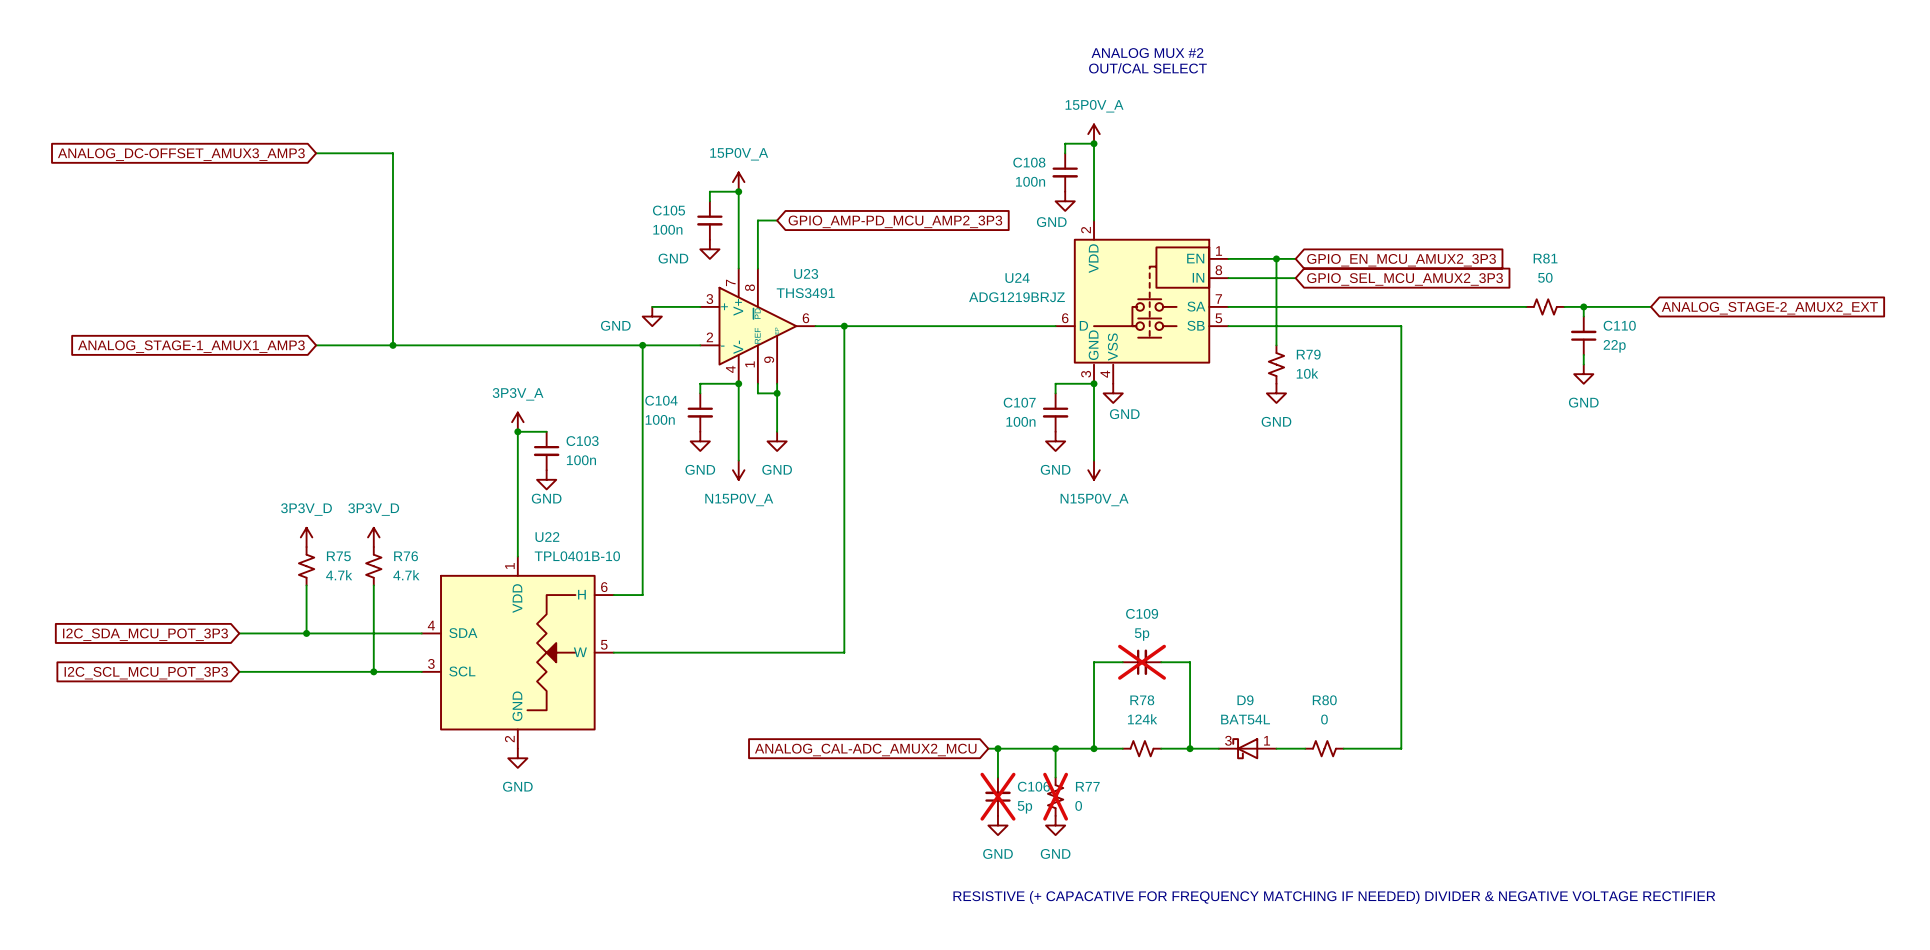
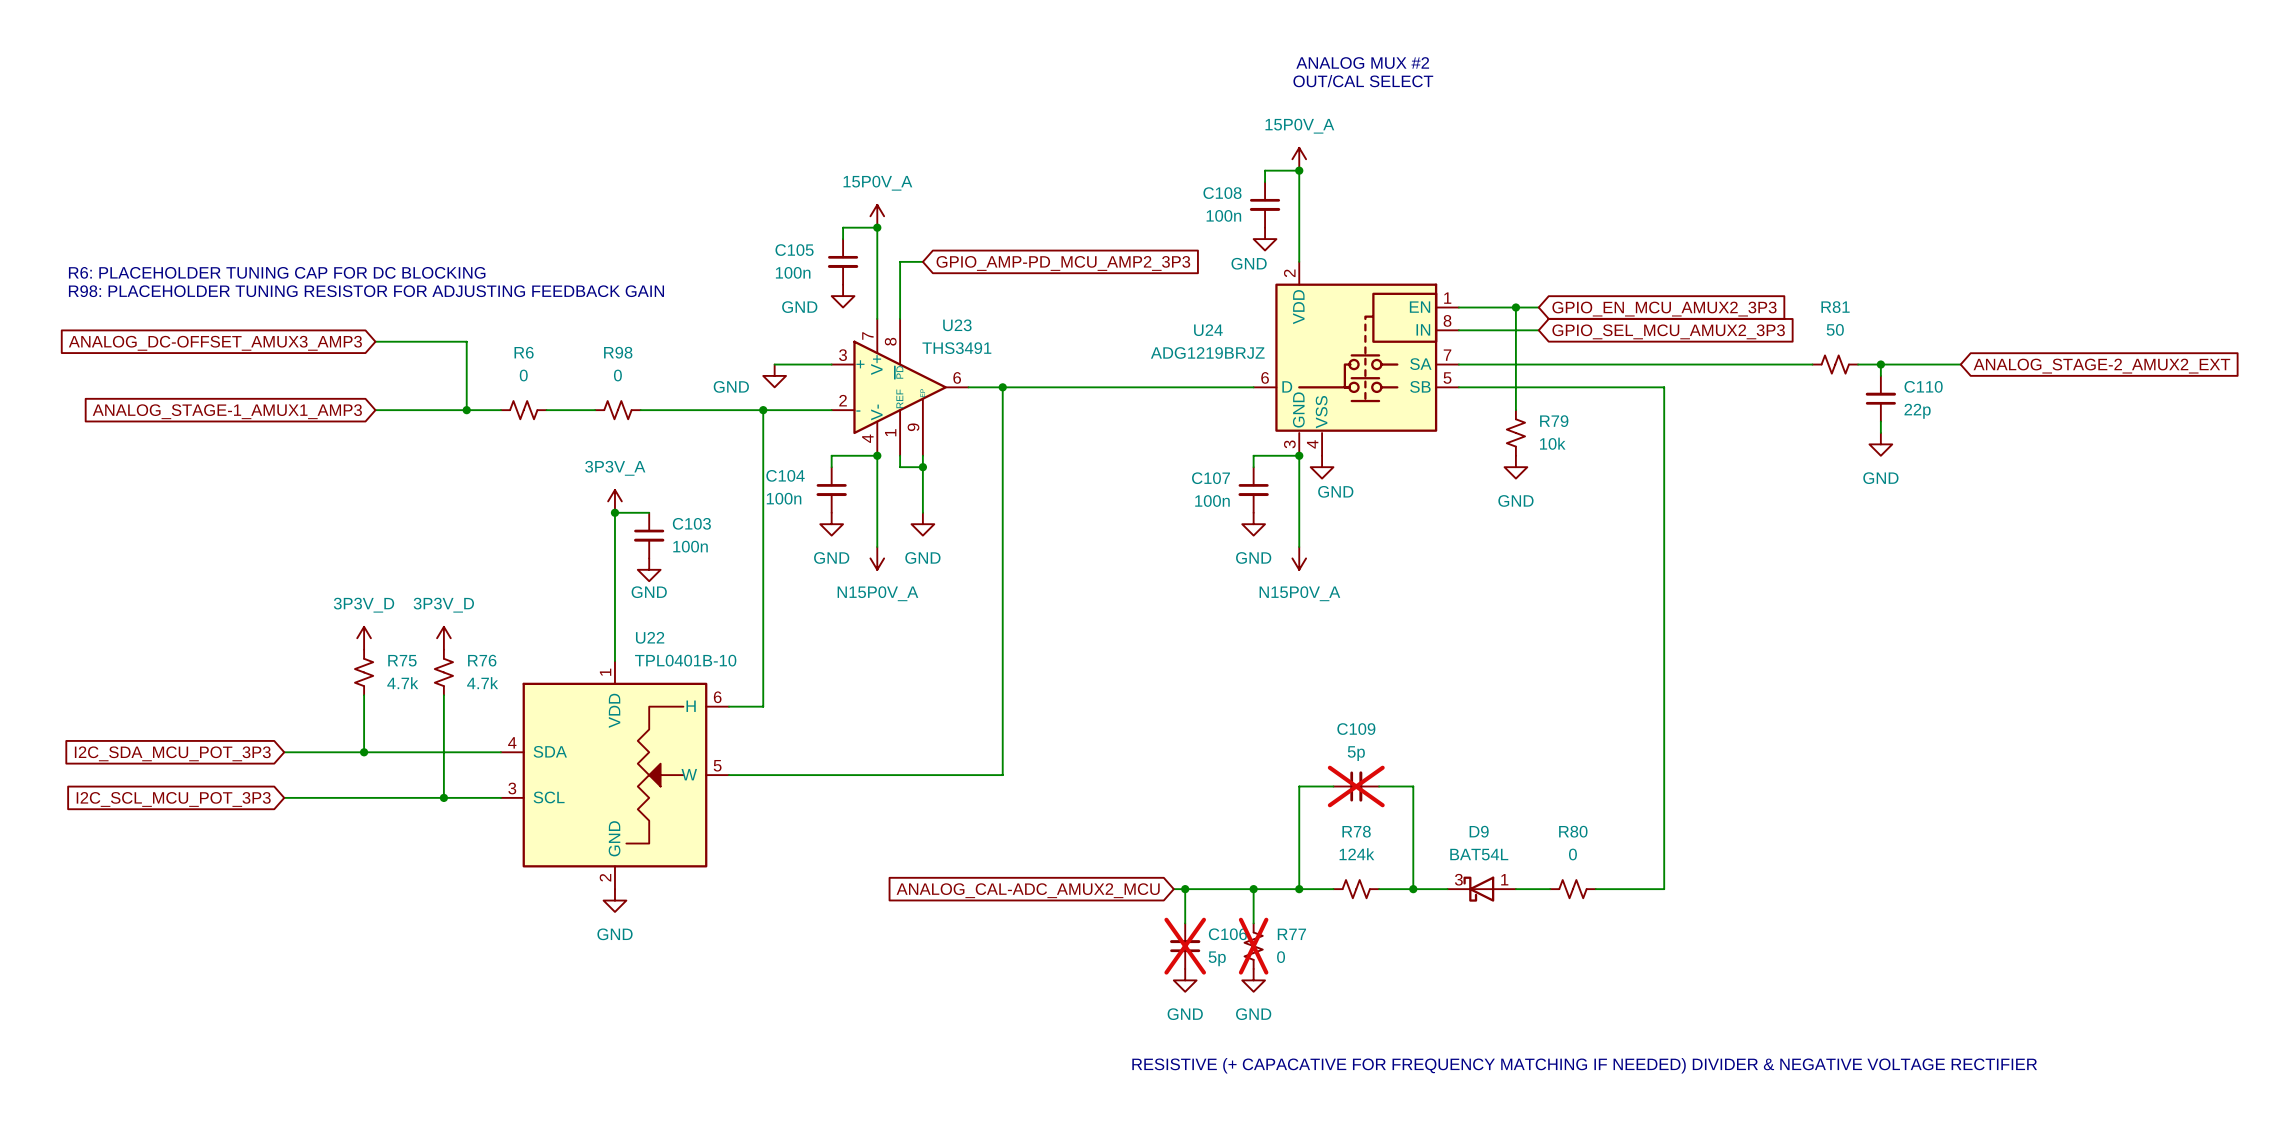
wire: (316, 153) (392, 153) (392, 287) -> (375, 341) (466, 341)
global label position: ANALOG_DC-OFFSET_AMUX3_AMP3 (181, 154) -> ANALOG_DC-OFFSET_AMUX3_AMP3 (215, 343)
text: none -> R6: PLACEHOLDER TUNING CAP FOR DC BLOCKING (277, 272)
text: none -> R98: PLACEHOLDER TUNING RESISTOR FOR ADJUSTING FEEDBACK GAIN (366, 291)
R6: none -> 0 (523, 410)
R98: none -> 0 (617, 410)

